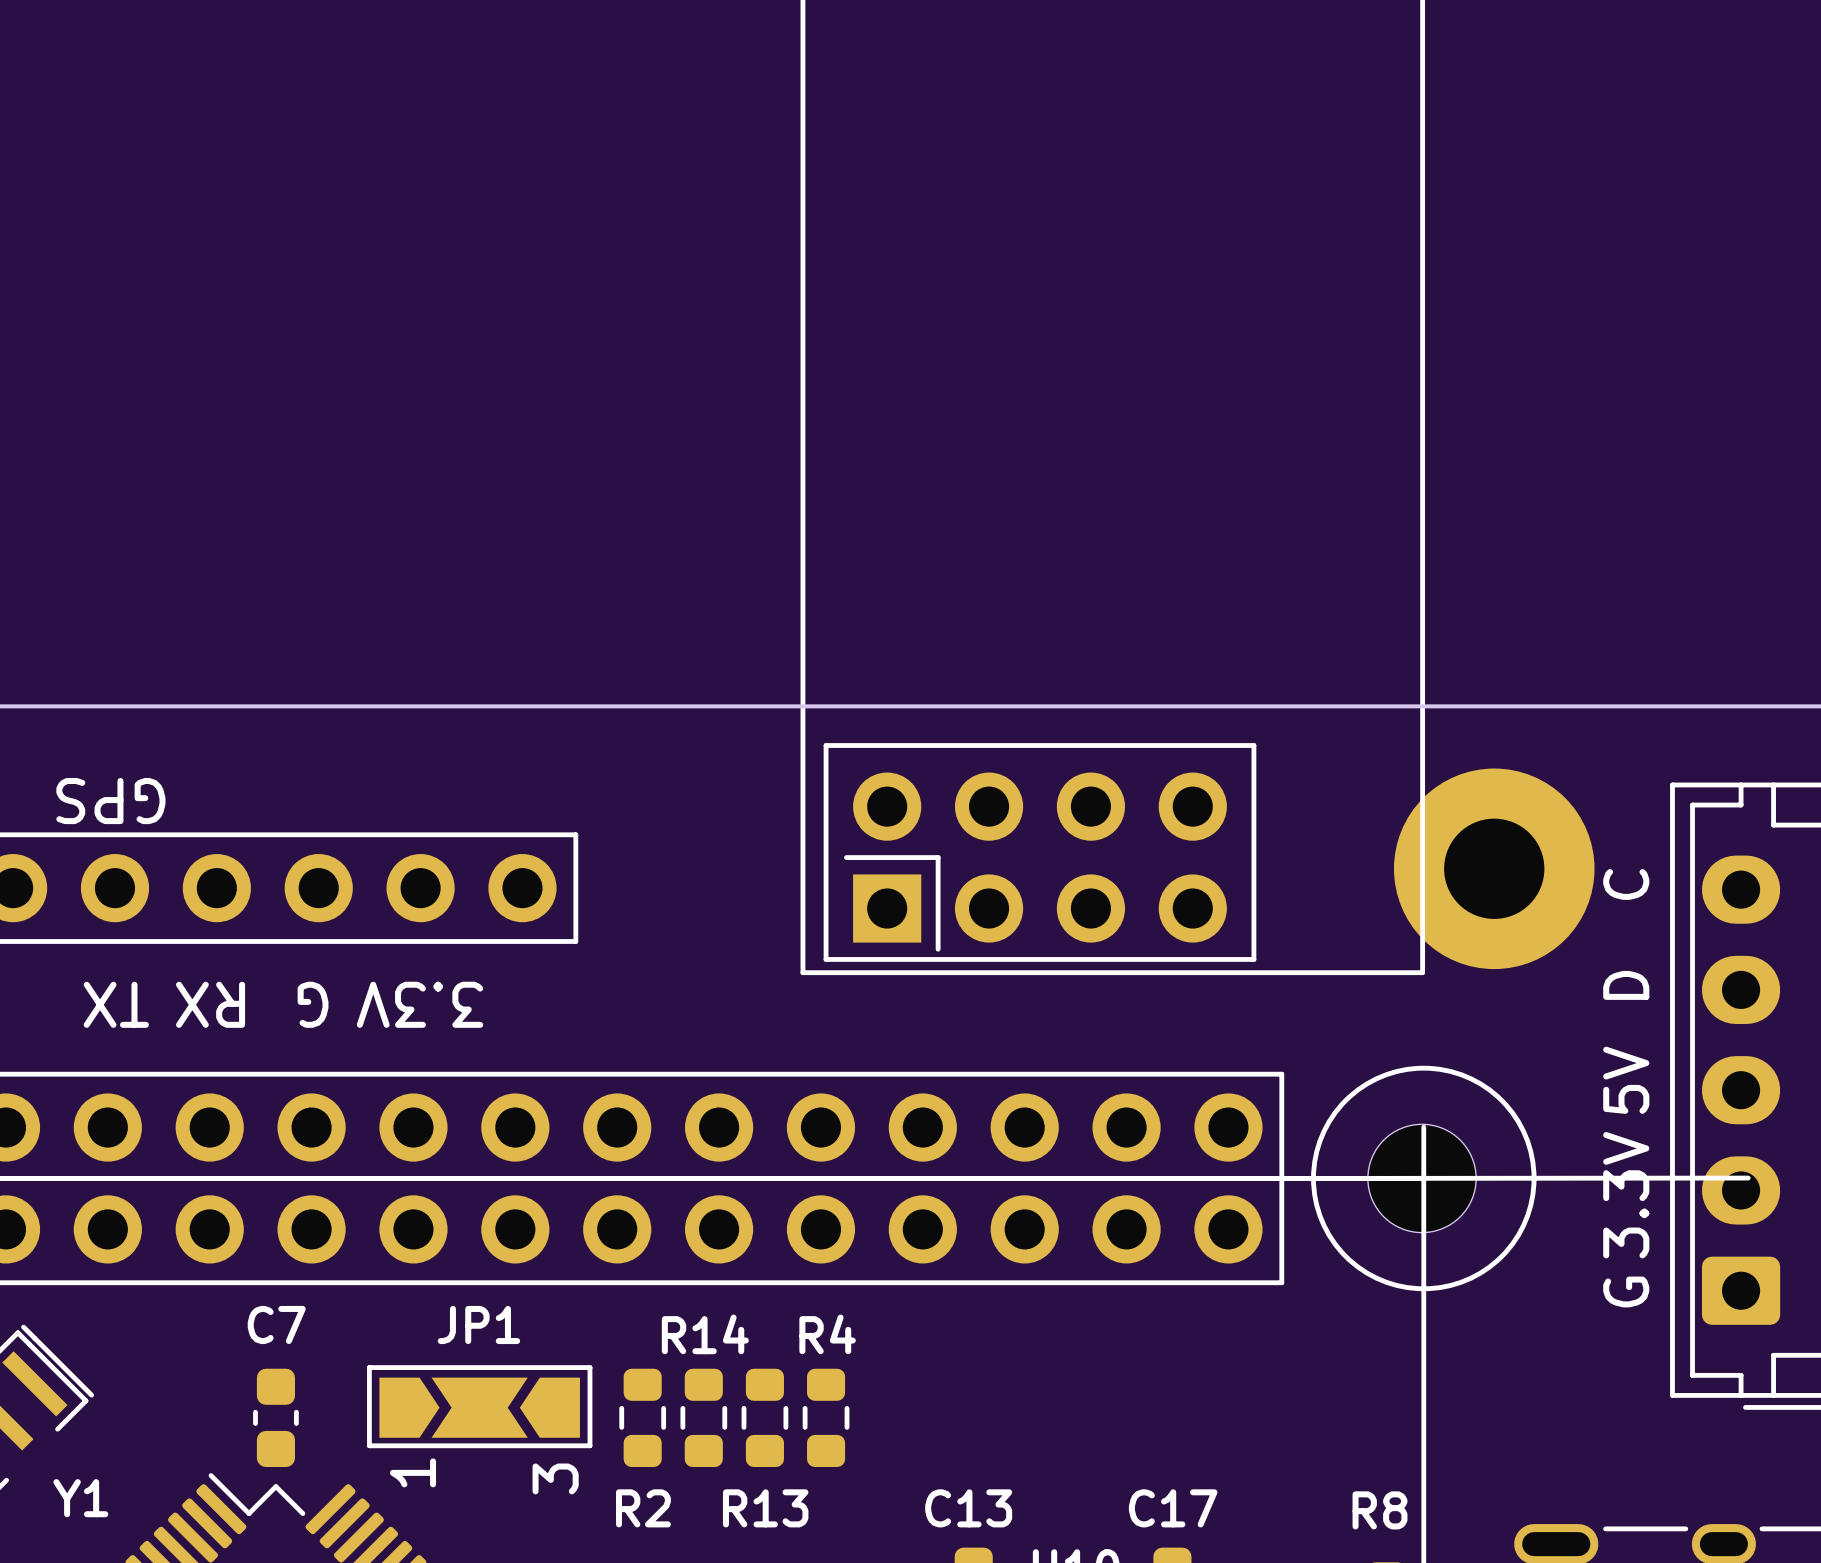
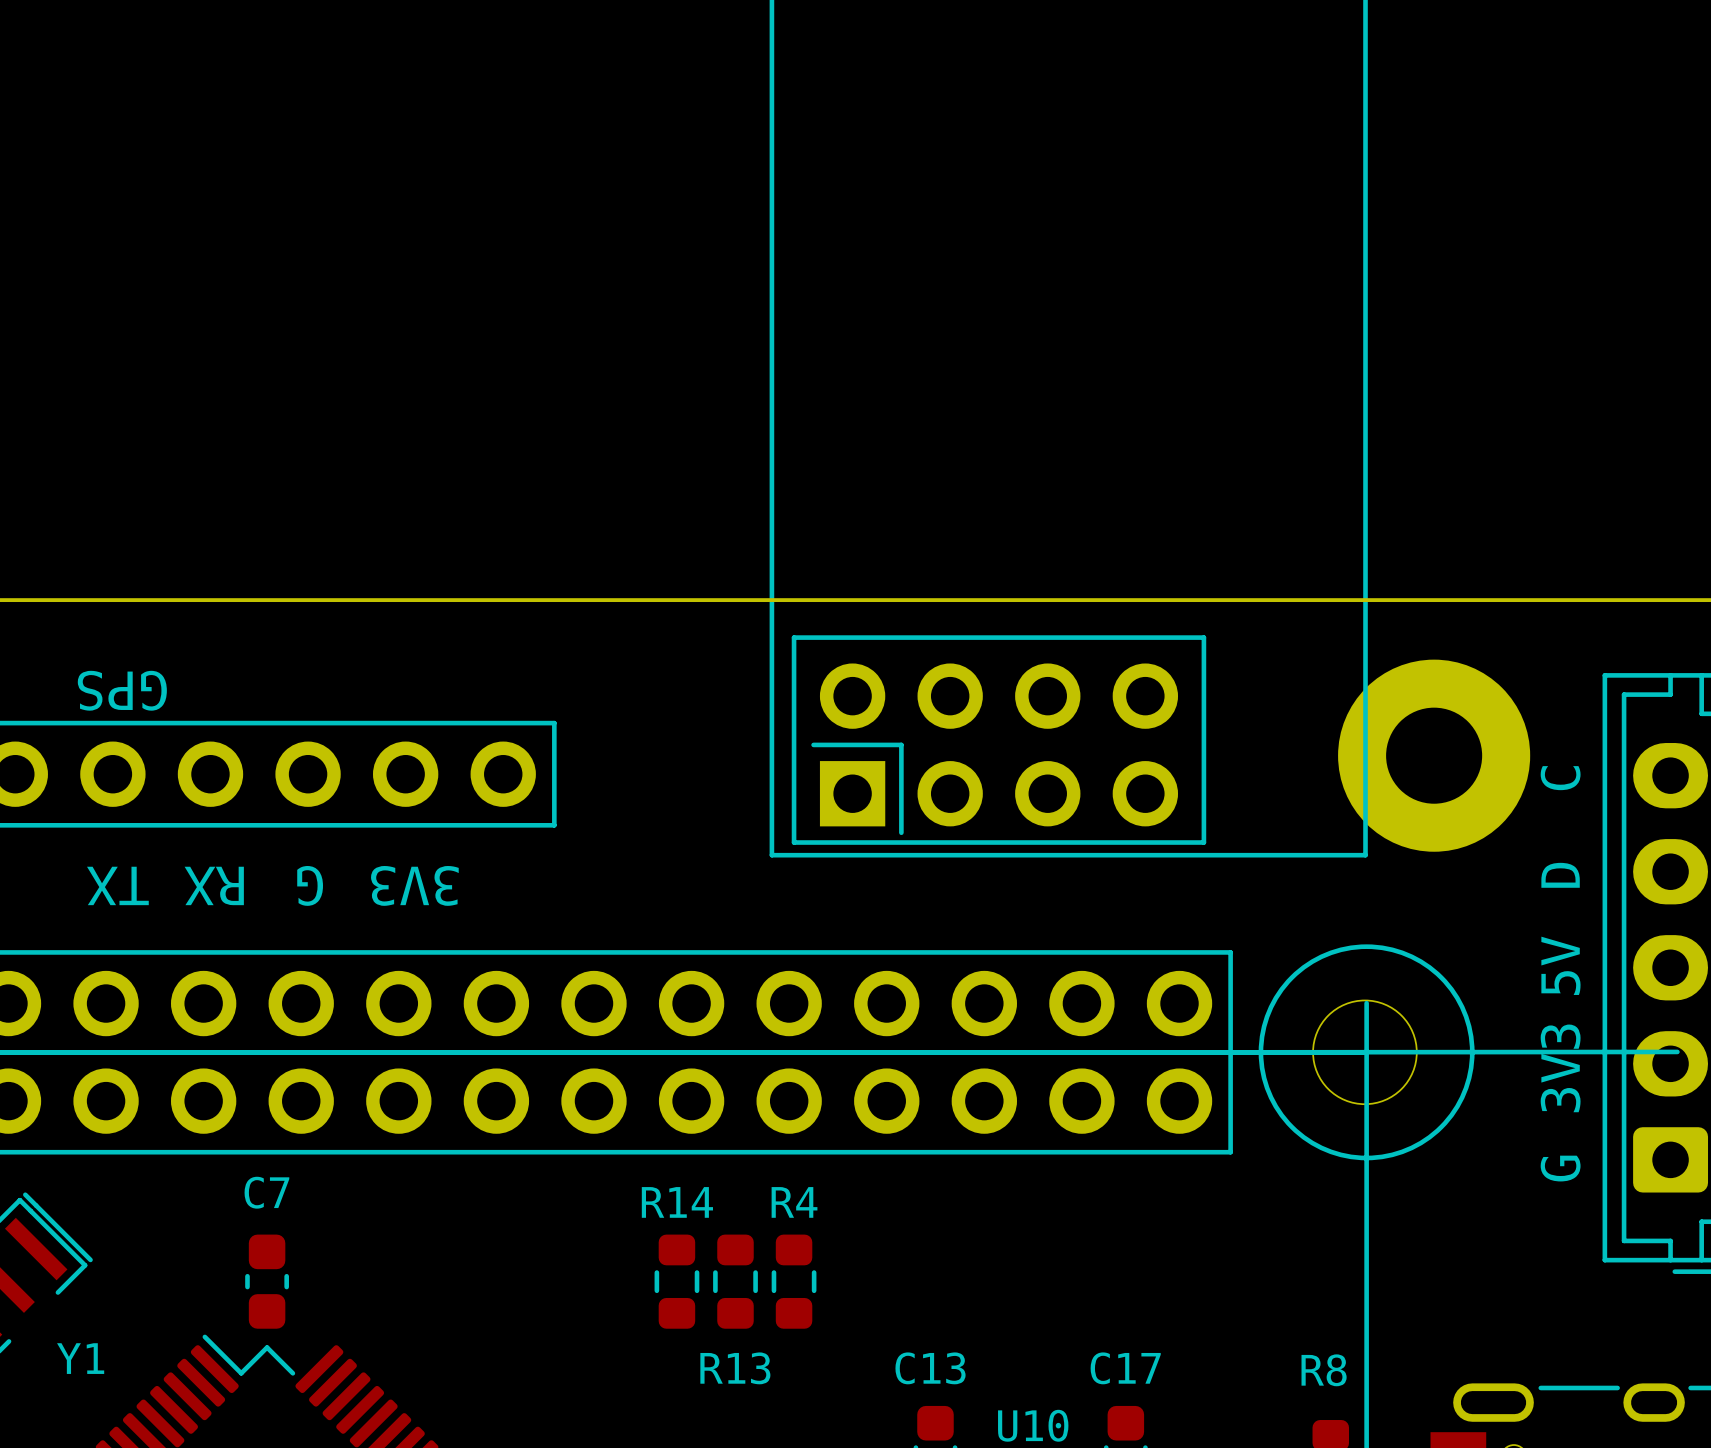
text: 3.3V (420, 1004) -> 3V3 (414, 885)
text: 3.3V (1626, 1195) -> 3V3 (1560, 1068)
JP1: (479, 1406) -> none
R2: (642, 1417) -> none

